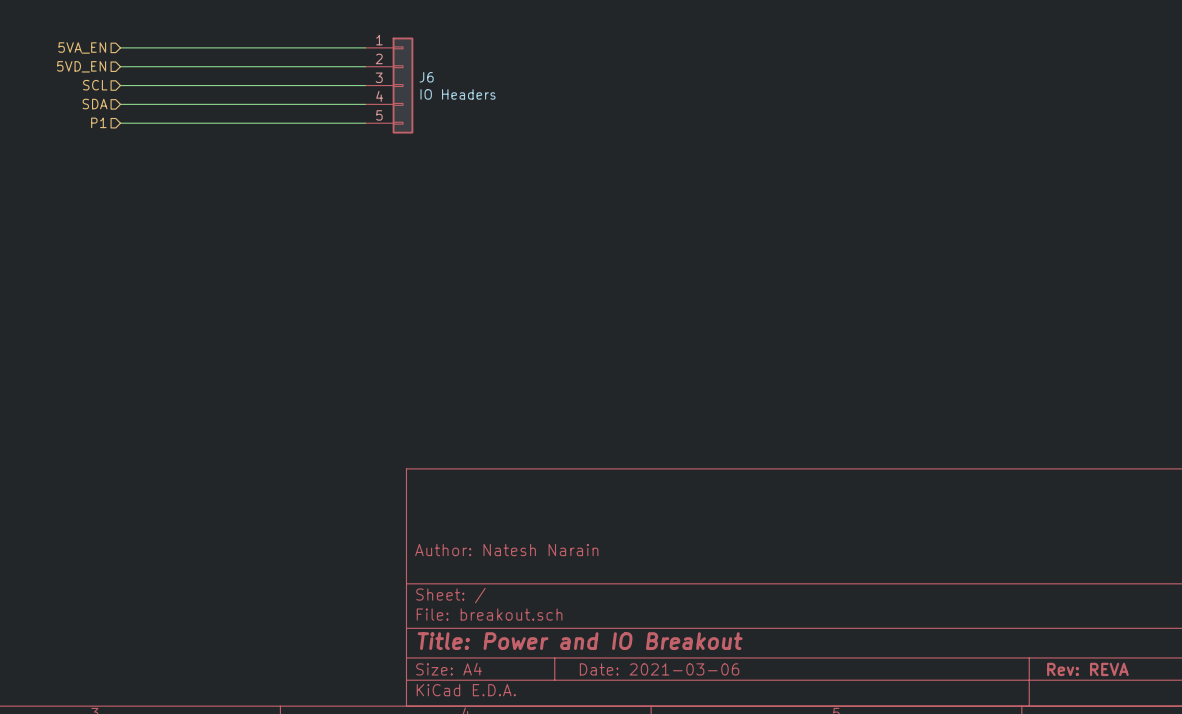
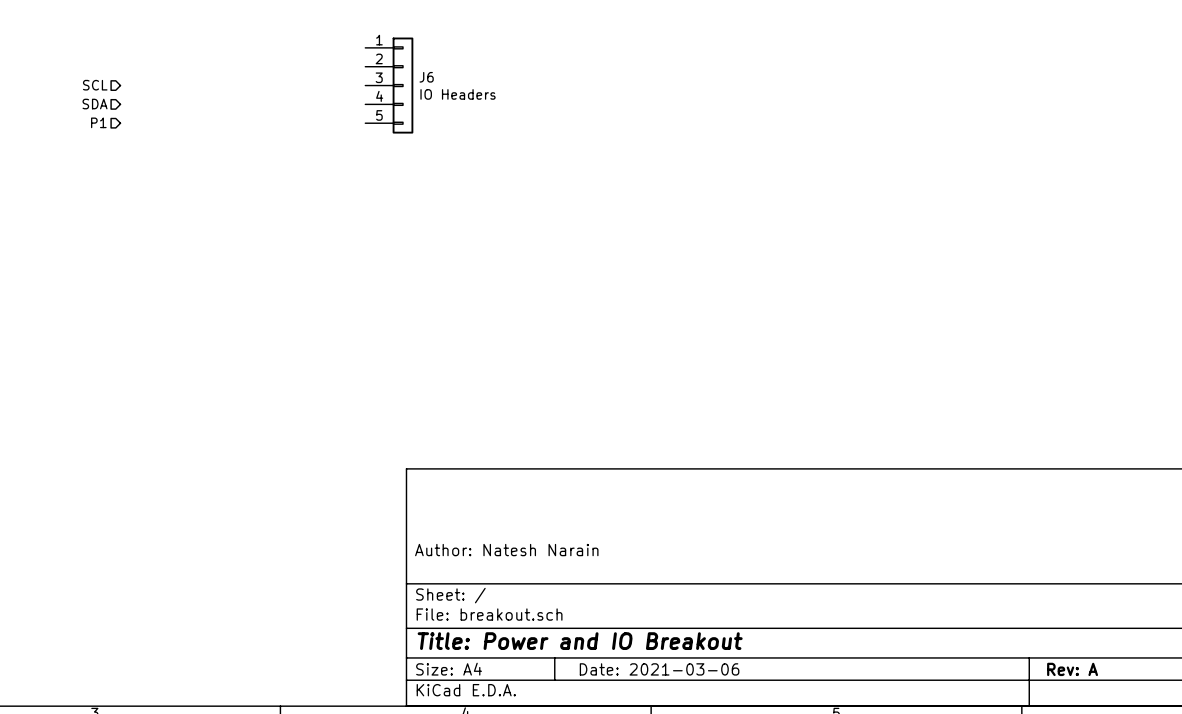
hierarchical label: 5VA_EN (82, 47) -> none
wire: (120, 47) (365, 47) -> none
hierarchical label: 5VD_EN (81, 66) -> none
wire: (120, 66) (365, 66) -> none
wire: (120, 85) (365, 85) -> none
wire: (120, 104) (365, 104) -> none
wire: (120, 123) (365, 123) -> none
title block: Rev: REVA (1087, 669) -> Rev: A (1072, 669)

